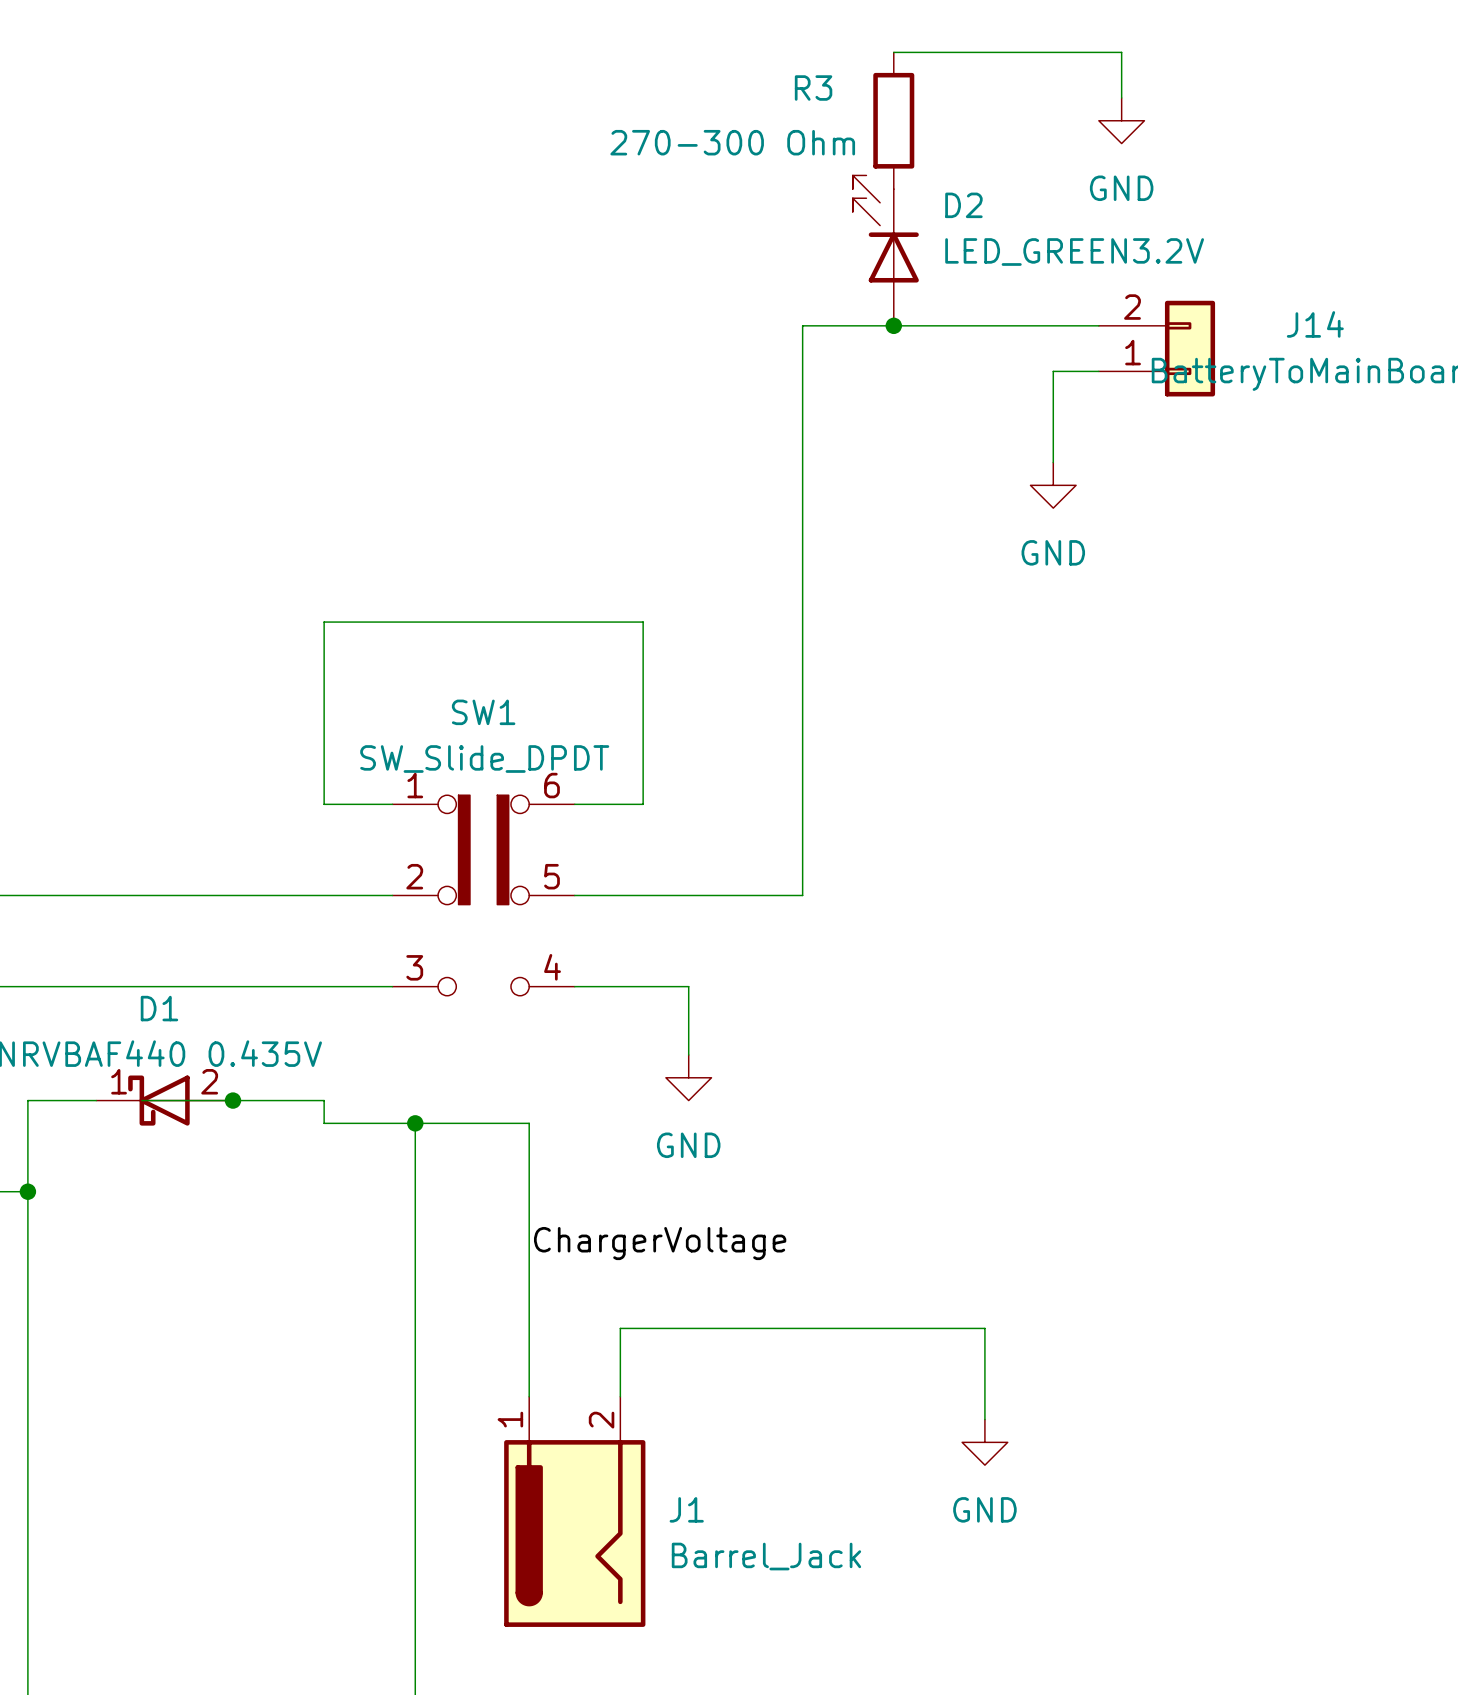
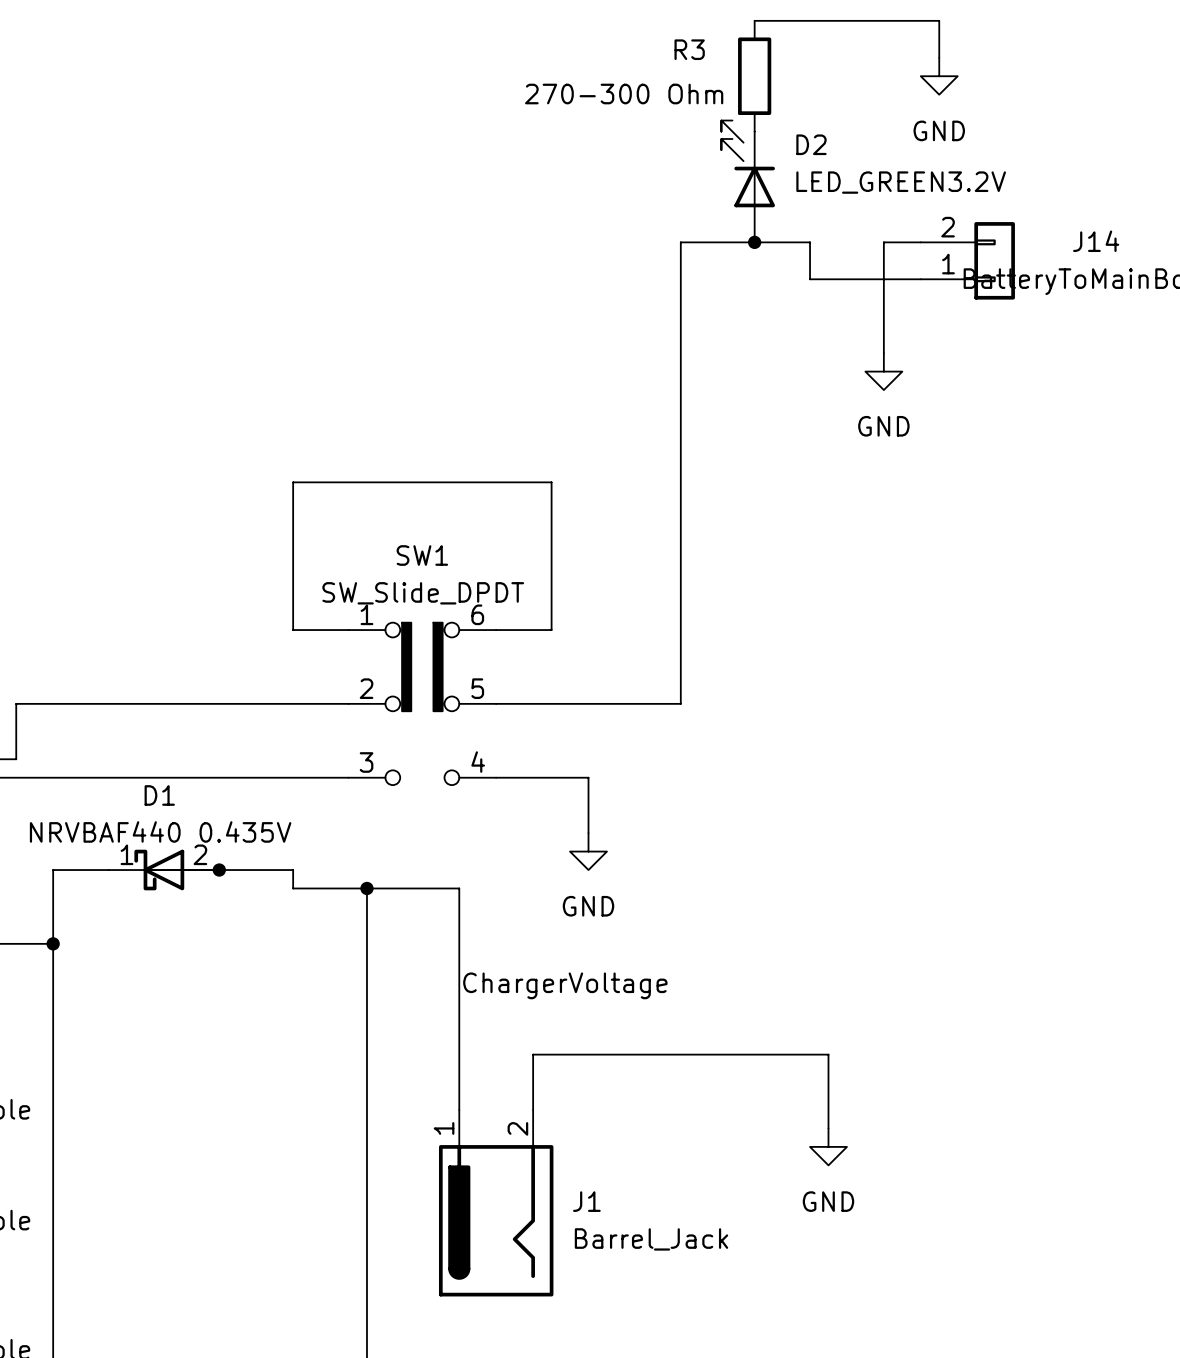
wire: (962, 325) (1053, 325) -> (810, 242) (810, 279) (883, 279) (883, 242)

